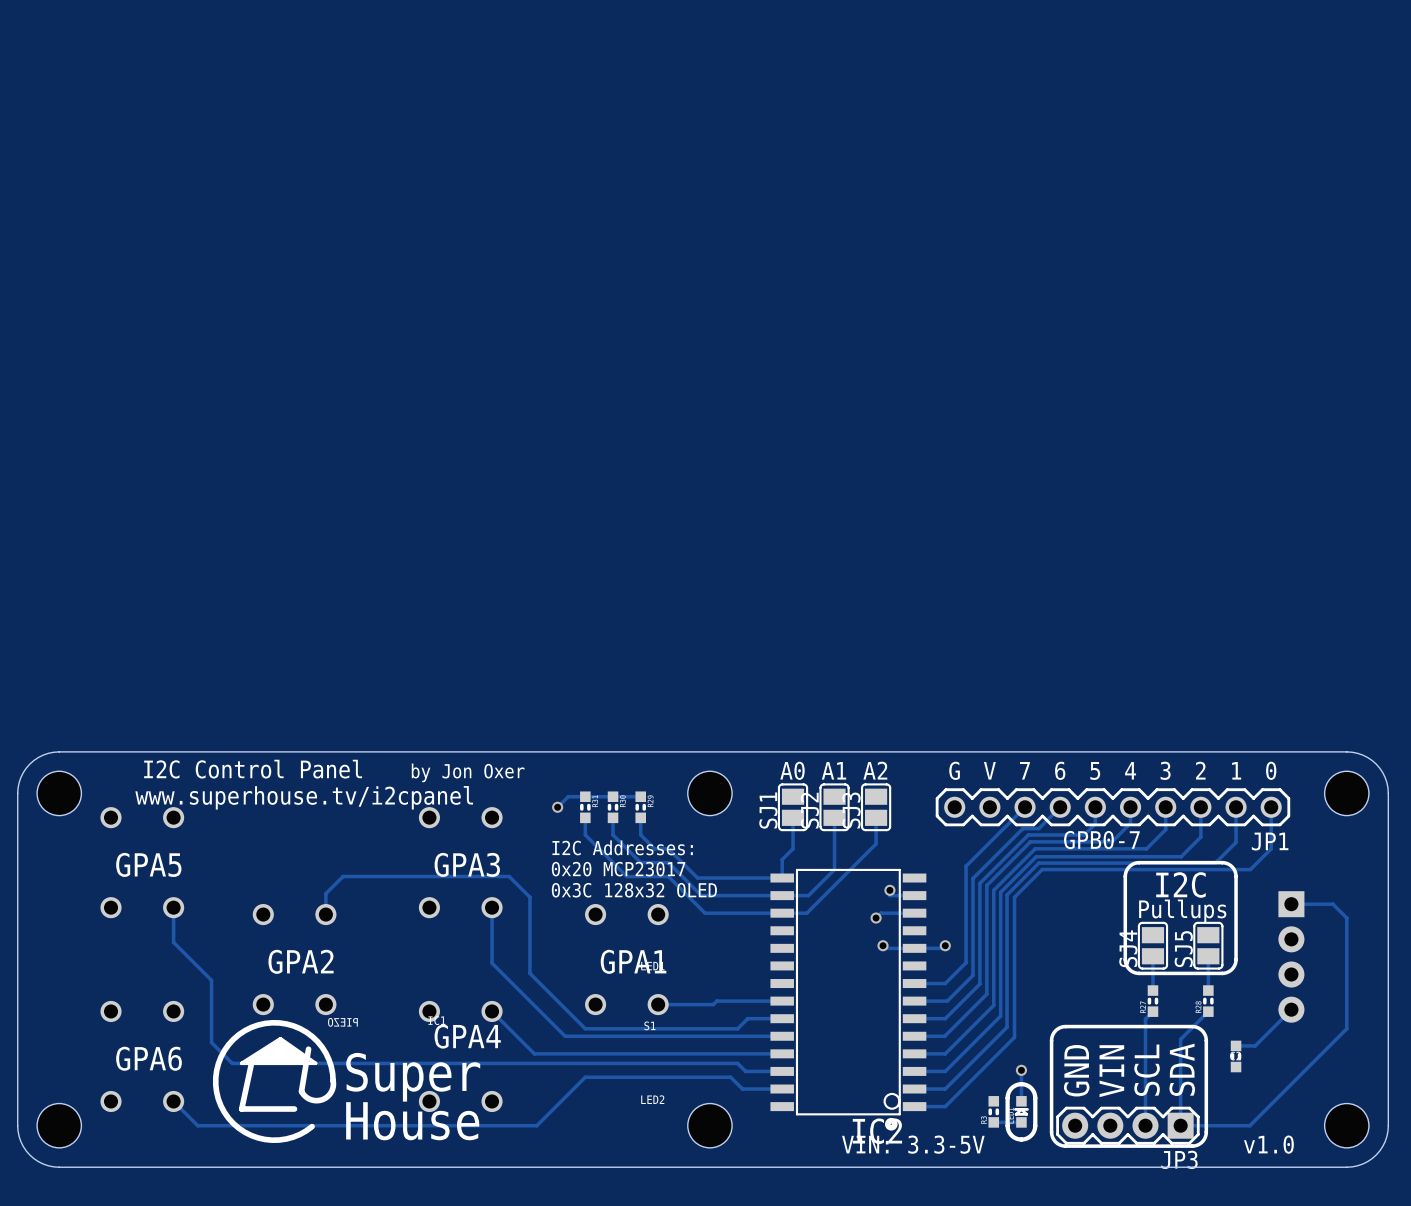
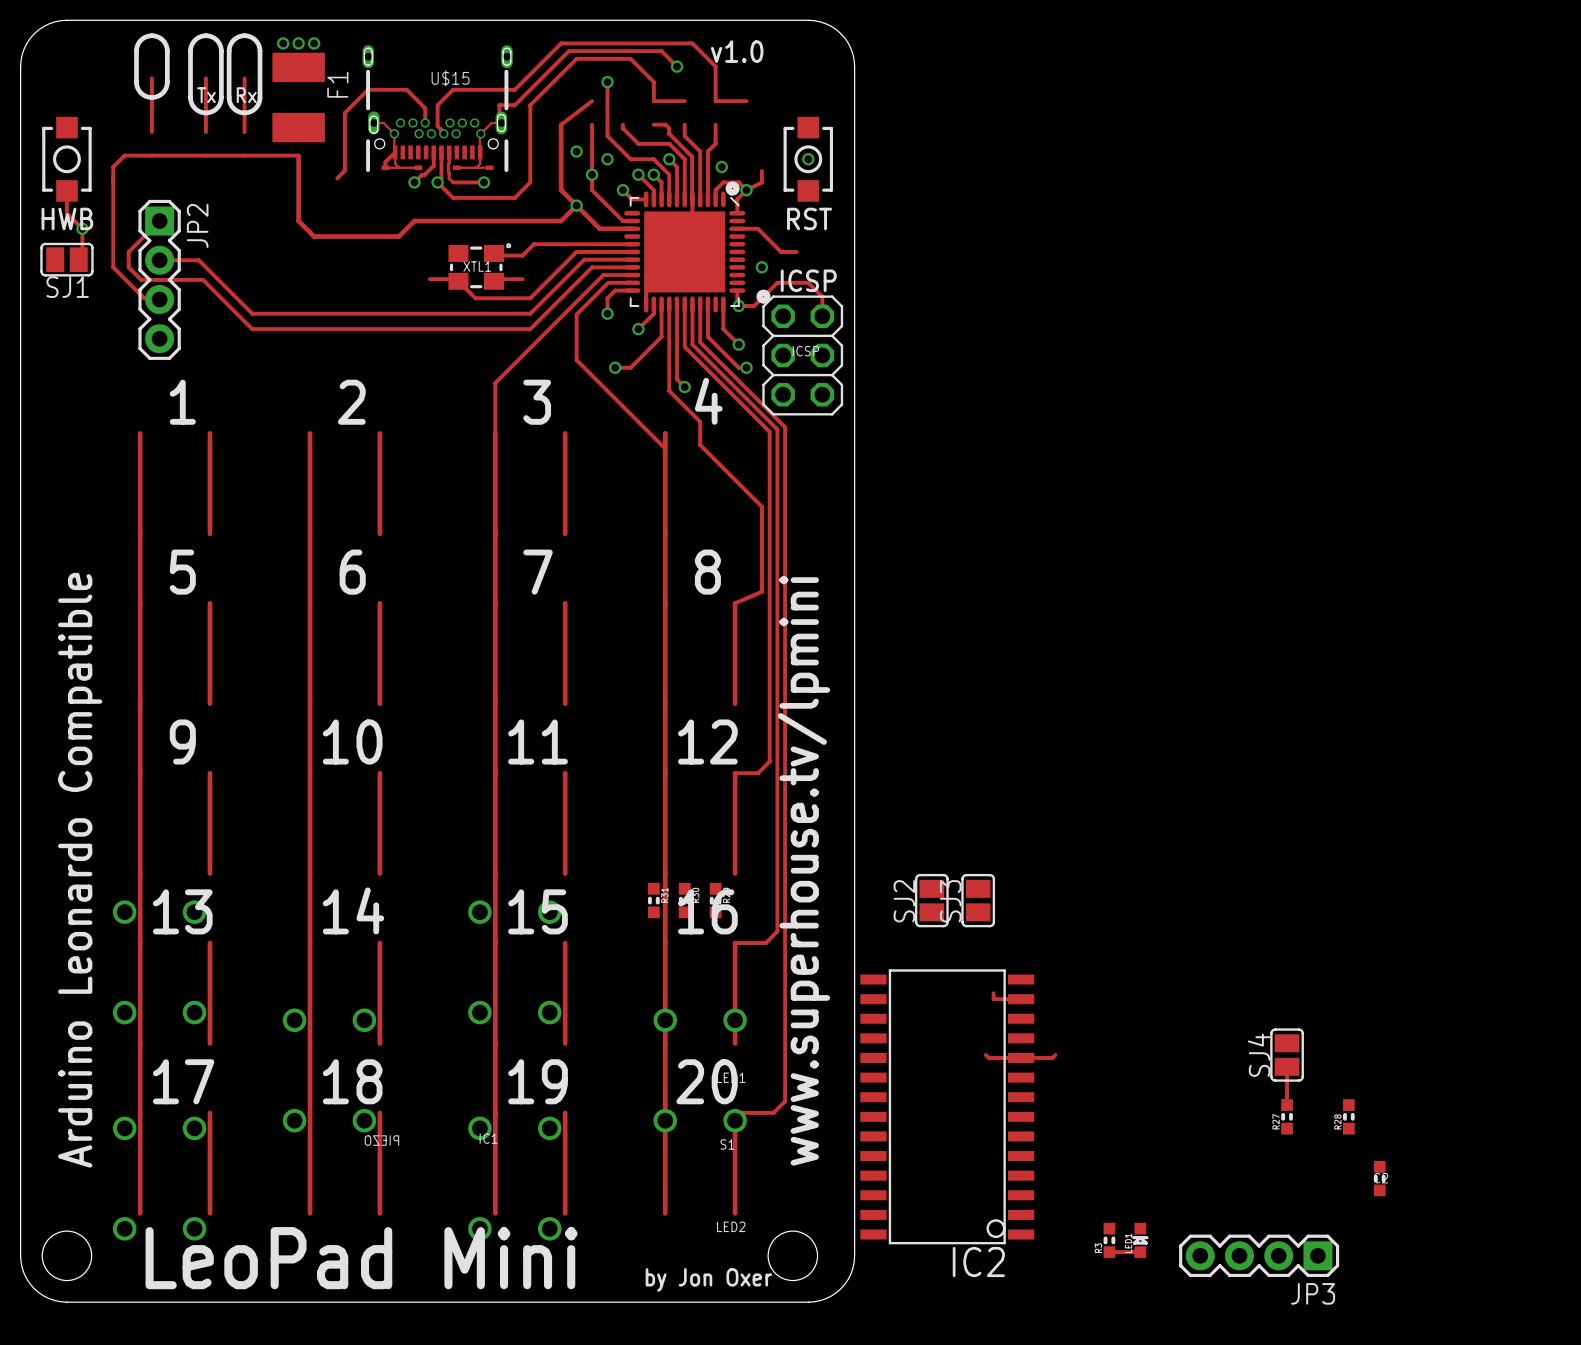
line: none -> (151, 35) (162, 40) (167, 51) (166, 86) (161, 94) (151, 97) (140, 92) (136, 82) (136, 47) (142, 38) (151, 35)
line: none -> (205, 35) (216, 40) (221, 51) (220, 101) (215, 109) (205, 112) (195, 108) (190, 97) (191, 47) (196, 38) (205, 35)
line: none -> (244, 35) (255, 40) (260, 51) (259, 101) (253, 109) (244, 112) (233, 108) (229, 97) (229, 47) (235, 38) (244, 35)
via: none -> (283, 43)
via: none -> (298, 43)
via: none -> (314, 43)
text: none -> v1.0 (737, 51)
track: none -> (677, 66) (661, 51) (568, 51) (514, 105) (499, 105) (499, 120) (501, 122) (491, 122) (479, 134) (479, 149)
via: none -> (677, 66)
track: none -> (151, 78) (151, 132)
track: none -> (205, 78) (205, 132)
track: none -> (244, 78) (244, 132)
track: none -> (607, 82) (607, 136) (630, 159) (653, 159) (669, 174) (669, 199)
via: none -> (607, 82)
text: none -> Tx (206, 95)
text: none -> Rx (246, 95)
F1: none -> (298, 97)
track: none -> (592, 101) (561, 124) (561, 190) (599, 228) (632, 228)
track: none -> (684, 101) (653, 101) (653, 82) (630, 58) (576, 58) (530, 105) (530, 182) (514, 197) (453, 197) (437, 182) (441, 178) (441, 152)
track: none -> (746, 101) (715, 101) (715, 66) (692, 43) (561, 43) (514, 89) (453, 89) (437, 105) (437, 126) (443, 133)
U$15: none -> (437, 108)
track: none -> (373, 122) (383, 122) (394, 133) (394, 151)
track: none -> (425, 122) (425, 108) (406, 89) (368, 89) (344, 112) (344, 170) (337, 178)
track: none -> (592, 124) (592, 190) (622, 221) (632, 221)
track: none -> (622, 124) (622, 128) (638, 143) (669, 143) (684, 159) (684, 199)
track: none -> (653, 124) (665, 124) (669, 128) (669, 133) (692, 156) (692, 244) (684, 251) (669, 251) (646, 275) (646, 304)
track: none -> (684, 124) (684, 136) (700, 151) (700, 199)
track: none -> (715, 124) (715, 143) (707, 151) (707, 199)
track: none -> (480, 149) (480, 163) (476, 167)
via: none -> (576, 151)
track: none -> (433, 152) (433, 165) (414, 182)
track: none -> (449, 152) (448, 172) (449, 178) (453, 182) (483, 182)
part: none -> (66, 159)
via: none -> (607, 159)
track: none -> (669, 159) (677, 167) (677, 199)
via: none -> (669, 159)
part: none -> (808, 159)
via: none -> (808, 159)
via: none -> (721, 167)
track: none -> (399, 167) (395, 163) (395, 152) (385, 162) (385, 167) (418, 167)
track: none -> (456, 167) (489, 167)
track: none -> (761, 171) (761, 182) (746, 190)
via: none -> (592, 174)
track: none -> (638, 174) (653, 190) (653, 199)
via: none -> (638, 174)
track: none -> (653, 174) (661, 182) (661, 199)
via: none -> (653, 174)
drawing: none -> [725, 181, 740, 196]
via: none -> (414, 182)
via: none -> (437, 182)
via: none -> (483, 182)
track: none -> (622, 190) (632, 199) (646, 199)
via: none -> (622, 190)
track: none -> (746, 190) (737, 199) (737, 213)
track: none -> (746, 190) (738, 182) (723, 182) (715, 190) (715, 199)
via: none -> (746, 190)
track: none -> (66, 190) (66, 213) (82, 228) (82, 255) (78, 259)
track: none -> (576, 205) (561, 221) (414, 221) (399, 236) (314, 236) (298, 221) (298, 155) (124, 155) (113, 167) (113, 267) (144, 298) (159, 299)
via: none -> (576, 205)
text: none -> HWB (67, 218)
text: none -> RST (809, 218)
track: none -> (159, 221) (128, 251) (128, 267) (141, 279) (203, 279) (252, 329) (530, 329) (592, 267) (632, 267)
via: none -> (82, 228)
track: none -> (737, 228) (757, 228) (781, 251) (796, 251)
track: none -> (632, 244) (533, 244) (522, 255) (496, 255) (493, 253) (493, 256)
track: none -> (632, 251) (576, 251) (530, 298) (475, 298) (456, 279) (429, 279)
part: none -> (684, 251)
track: none -> (632, 259) (584, 259) (530, 313) (252, 313) (198, 260) (159, 260)
XTL1: none -> (479, 266)
via: none -> (761, 267)
track: none -> (632, 275) (603, 275) (495, 382) (495, 1213)
JP2: none -> (159, 279)
track: none -> (522, 279) (496, 279) (493, 281)
text: none -> ICSP (808, 280)
track: none -> (632, 282) (608, 282) (576, 314) (576, 360) (665, 448) (665, 433) (665, 1213)
drawing: none -> [756, 289, 771, 304]
track: none -> (632, 290) (615, 290) (607, 298) (607, 313)
track: none -> (737, 290) (738, 306) (754, 306) (777, 282) (808, 282) (822, 296) (822, 315)
track: none -> (653, 304) (653, 313) (638, 329)
track: none -> (661, 304) (661, 336) (630, 367) (615, 367)
track: none -> (669, 304) (669, 390) (700, 421) (700, 445) (761, 506) (761, 591) (735, 603) (735, 703)
track: none -> (677, 304) (677, 379) (684, 387)
track: none -> (684, 304) (684, 346) (769, 431) (769, 761) (758, 773) (735, 773) (735, 873)
track: none -> (692, 304) (692, 344) (777, 429) (777, 931) (765, 943) (735, 943) (735, 1043)
track: none -> (700, 304) (700, 342) (785, 427) (785, 1101) (773, 1112) (735, 1112) (735, 1213)
track: none -> (707, 304) (707, 336) (738, 367) (746, 367)
track: none -> (723, 304) (723, 329) (738, 344)
via: none -> (738, 306)
via: none -> (607, 313)
via: none -> (638, 329)
via: none -> (738, 344)
ICSP: none -> (802, 355)
via: none -> (615, 367)
via: none -> (746, 367)
via: none -> (684, 387)
text: none -> 1 (182, 402)
text: none -> 2 (351, 402)
text: none -> 3 (537, 402)
text: none -> 4 (708, 401)
track: none -> (140, 433) (140, 1213)
track: none -> (209, 433) (209, 533)
track: none -> (310, 433) (310, 1213)
track: none -> (379, 433) (379, 533)
track: none -> (565, 433) (565, 533)
text: none -> 6 (352, 572)
text: none -> 7 (538, 572)
text: none -> 8 (707, 572)
text: none -> 5 (182, 572)
track: none -> (209, 603) (209, 703)
track: none -> (379, 603) (379, 703)
track: none -> (565, 603) (565, 703)
text: none -> 12 (707, 741)
text: none -> 9 (182, 741)
text: none -> 10 (352, 741)
text: none -> 11 (538, 741)
track: none -> (209, 773) (209, 873)
track: none -> (379, 773) (379, 873)
track: none -> (565, 773) (565, 873)
text: I2C Control Panel (253, 769) -> none
text: A0 (792, 770) -> none
text: A1 (834, 770) -> none
text: A2 (875, 770) -> none
text: G (954, 770) -> none
text: V (989, 770) -> none
text: 7 (1024, 770) -> none
text: 6 (1060, 770) -> none
text: 5 (1095, 770) -> none
text: 4 (1130, 770) -> none
text: 3 (1165, 770) -> none
text: 2 (1200, 770) -> none
text: 1 (1236, 770) -> none
text: 0 (1271, 770) -> none
text: by Jon Oxer (468, 772) -> none
text: none -> www.superhouse.tv/lpmini (803, 870)
text: none -> Arduino Leonardo Compatible (80, 870)
board edge: (17, 793) (20, 777) (29, 764) (43, 755) (59, 751) (1346, 751) (1367, 757) (1382, 772) (1388, 793) (1388, 1125) (1382, 1146) (1367, 1161) (1346, 1167) (723, 1167) -> (20, 885) (20, 66) (24, 48) (34, 33) (49, 23) (66, 20) (808, 20) (820, 21) (831, 26) (841, 33) (848, 43) (853, 54) (854, 66) (854, 1255) (851, 1273) (841, 1288) (826, 1298) (808, 1302)
hole: (59, 793) -> none
hole: (709, 793) -> none
hole: (1346, 793) -> none
track: (640, 796) (568, 796) (557, 807) -> none
text: www.superhouse.tv/i2cpanel (304, 797) -> none
via: (557, 807) -> none
SJ1 rotation: 0° (793, 807) -> 90° clockwise (66, 259)
SJ1 position: (793, 807) -> (66, 259)
track: (1025, 807) (966, 866) (966, 962) (945, 983) (914, 983) -> none
track: (1060, 807) (1038, 828) (1022, 828) (972, 878) (972, 975) (947, 1001) (914, 1001) -> none
track: (1095, 807) (1095, 823) (1084, 834) (1028, 834) (979, 883) (979, 984) (945, 1018) (914, 1018) -> none
JP1: (1112, 807) -> none
track: (1130, 807) (1130, 823) (1111, 841) (1030, 841) (986, 885) (986, 994) (944, 1036) (914, 1036) -> none
track: (1165, 807) (1165, 829) (1146, 848) (1035, 848) (993, 890) (993, 1005) (945, 1053) (914, 1053) -> none
track: (1200, 807) (1200, 837) (1181, 856) (1036, 856) (1000, 892) (1000, 1016) (945, 1071) (914, 1071) -> none
track: (1236, 807) (1236, 842) (1215, 863) (1038, 863) (1007, 894) (1007, 1027) (945, 1089) (914, 1089) -> none
track: (1271, 807) (1271, 848) (1250, 869) (1042, 869) (1014, 897) (1014, 1037) (945, 1106) (914, 1106) -> none
SJ1 name position: SJ1 (768, 810) -> SJ1 (67, 287)
text: none -> 13 (182, 911)
text: none -> 14 (353, 910)
text: none -> 15 (538, 911)
track: (585, 817) (585, 834) (626, 876) (668, 876) (705, 913) (806, 913) (876, 843) (876, 817) -> none
track: (613, 817) (613, 834) (640, 862) (668, 862) (701, 895) (808, 895) (834, 869) (834, 817) -> none
text: none -> 16 (707, 911)
track: (640, 817) (640, 834) (654, 848) (668, 848) (697, 878) (782, 878) (782, 859) (793, 848) (793, 817) -> none
text: GPB0-7 (1101, 840) -> none
track: none -> (209, 943) (209, 1043)
track: none -> (379, 943) (379, 1043)
track: none -> (565, 943) (565, 1043)
text: I2C Addresses: (622, 847) -> none
line: (1139, 862) (1222, 862) (1233, 868) (1236, 876) (1236, 959) (1230, 970) (1222, 973) (1139, 973) (1128, 967) (1125, 959) (1125, 874) (1130, 865) (1139, 862) -> none
text: GPA5 (148, 864) -> none
text: GPA3 (467, 864) -> none
text: 0x20 MCP23017 (618, 869) -> none
text: I2C (1180, 884) -> none
text: 0x3C 128x32 OLED (634, 890) -> none
via: (889, 890) -> none
track: (1291, 904) (1332, 904) (1346, 918) (1346, 1028) (1249, 1125) (1180, 1125) (1180, 1039) (1208, 1011) -> none
track: (173, 907) (173, 942) (211, 980) (211, 1042) (232, 1063) (737, 1063) (745, 1071) (782, 1071) -> none
track: (492, 907) (492, 963) (565, 1036) (782, 1036) -> none
text: Pullups (1182, 911) -> none
track: (914, 913) (880, 913) (876, 918) -> none
track: (325, 914) (325, 893) (343, 876) (509, 876) (529, 897) (529, 973) (585, 1028) (737, 1028) (747, 1018) (782, 1018) -> none
via: (876, 918) -> none
via: (883, 945) -> none
via: (945, 945) -> none
SJ5: (1208, 945) -> none
track: (1208, 956) (1208, 990) -> none
part: (1291, 956) -> none
text: GPA2 (301, 961) -> none
text: GPA1 (633, 961) -> none
text: none -> 17 (183, 1081)
text: none -> 18 (352, 1081)
text: none -> 19 (538, 1081)
text: none -> 20 (707, 1081)
track: none -> (209, 1112) (209, 1213)
track: none -> (379, 1112) (379, 1213)
track: none -> (565, 1112) (565, 1213)
track: (782, 1001) (716, 1001) (713, 1004) (658, 1004) -> none
track: (1291, 1009) (1255, 1045) (1236, 1045) -> none
track: (492, 1011) (534, 1053) (782, 1053) -> none
track: (1152, 1011) (1145, 1019) (1145, 1125) -> none
line: (1065, 1026) (1192, 1026) (1200, 1029) (1206, 1040) (1206, 1132) (1203, 1140) (1192, 1146) (1065, 1146) (1057, 1143) (1051, 1132) (1051, 1038) (1055, 1030) (1065, 1026) -> none
text: GPA4 (467, 1036) -> none
line: (280, 1038) (241, 1063) (315, 1063) (280, 1038) -> none
line: (280, 1049) (273, 1052) (290, 1052) (280, 1045) (259, 1056) (298, 1056) -> none
line: (308, 1049) (301, 1091) (311, 1099) (321, 1099) (329, 1095) (333, 1085) (331, 1066) (325, 1053) (317, 1041) (306, 1032) (293, 1025) (279, 1022) (258, 1025) (244, 1030) (233, 1039) (221, 1056) (216, 1070) (215, 1084) (218, 1099) (228, 1118) (238, 1128) (251, 1135) (272, 1140) (286, 1139) (299, 1134) (312, 1126) -> none
text: GPA6 (149, 1058) -> none
line: (248, 1059) (305, 1059) (280, 1042) (252, 1059) (241, 1109) (294, 1109) -> none
text: SDA (1182, 1069) -> none
track: (1021, 1070) (1021, 1101) -> none
via: (1021, 1070) -> none
text: GND (1076, 1070) -> none
text: SCL (1147, 1070) -> none
text: VIN (1111, 1071) -> none
text: Super (413, 1077) -> none
line: (1021, 1084) (1031, 1088) (1035, 1098) (1034, 1129) (1029, 1136) (1021, 1139) (1011, 1135) (1007, 1125) (1008, 1094) (1013, 1087) (1021, 1084) -> none
track: (782, 1089) (742, 1089) (730, 1077) (585, 1077) (536, 1125) (197, 1125) (173, 1101) -> none
drawing: [884, 1117, 898, 1131] -> none
text: House (412, 1121) -> none
hole: (1346, 1125) -> none
text: none -> LeoPad Mini (361, 1258)
text: VIN: 3.3-5V (913, 1144) -> none
text: v1.0 (1268, 1144) -> none
text: none -> by Jon Oxer (708, 1279)

